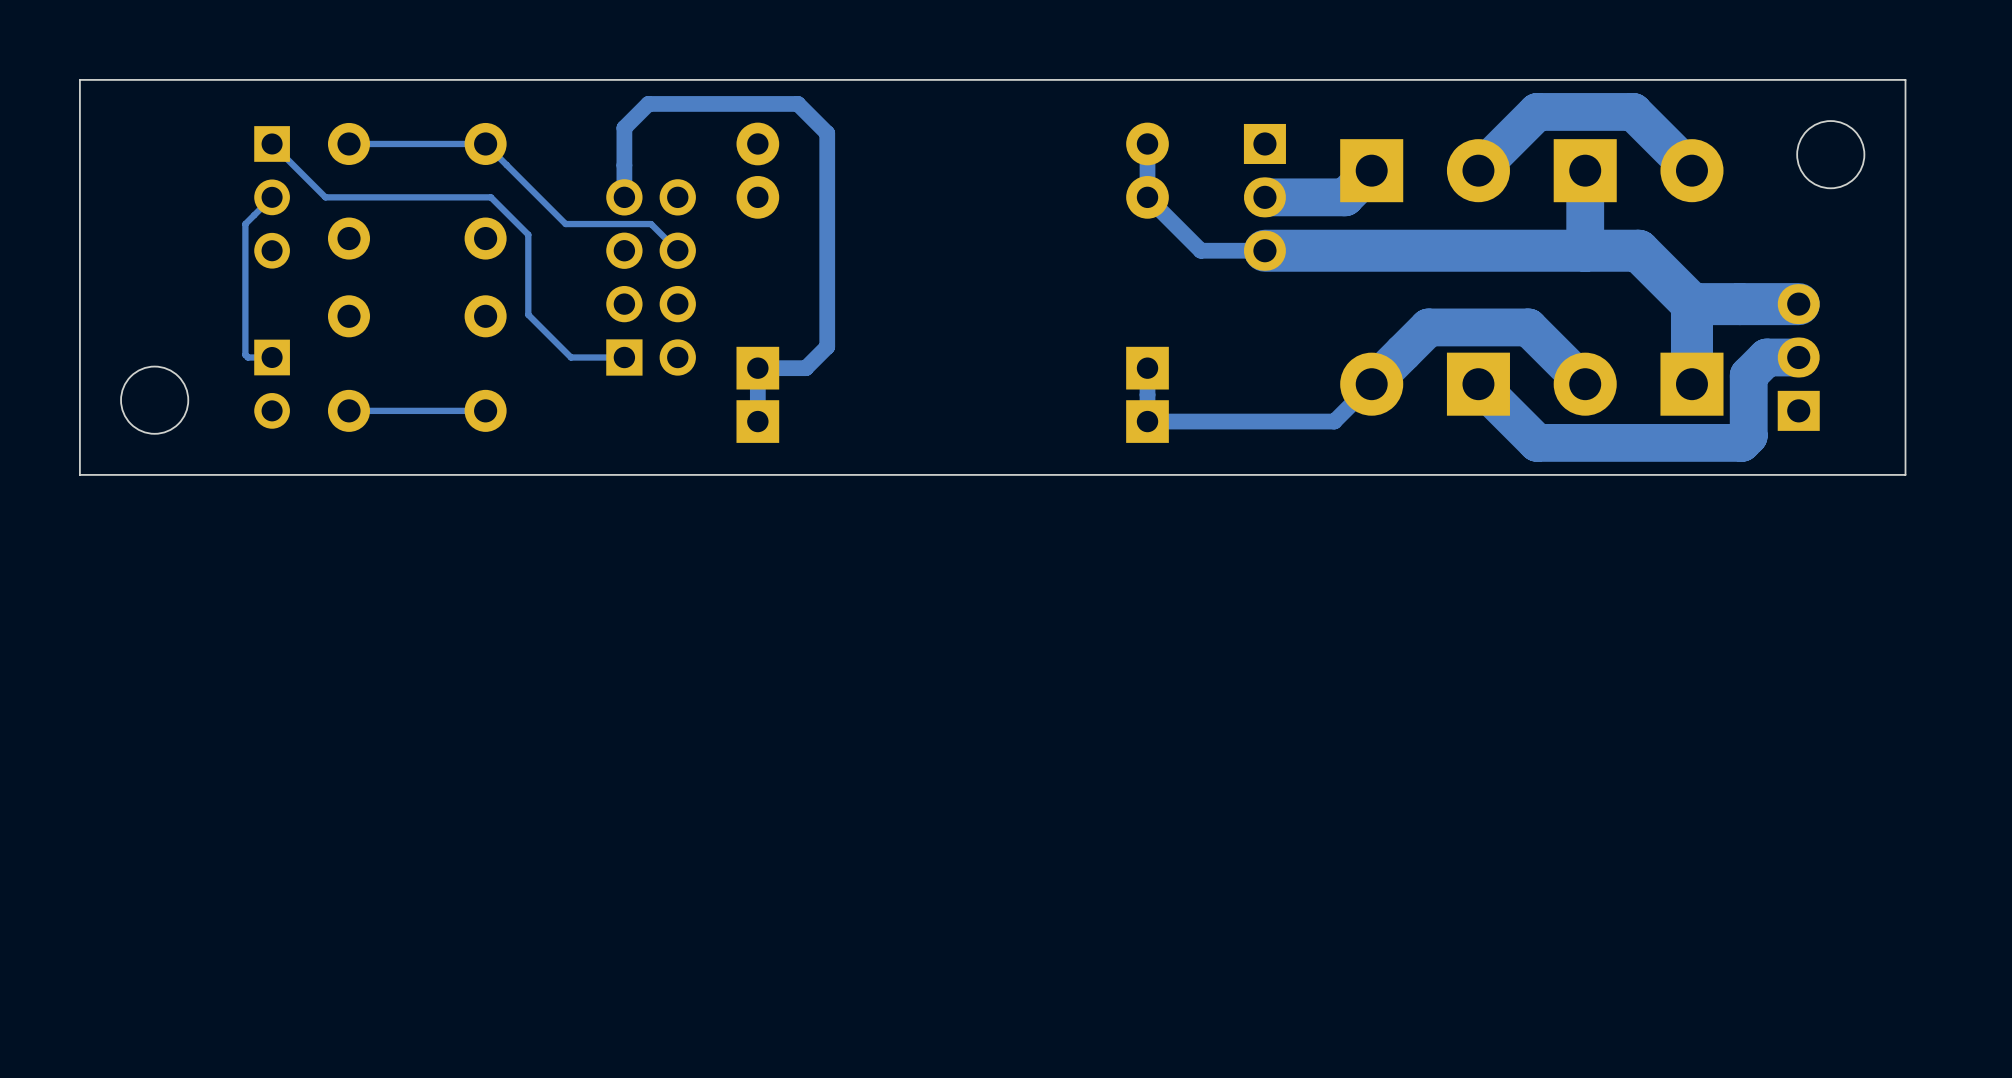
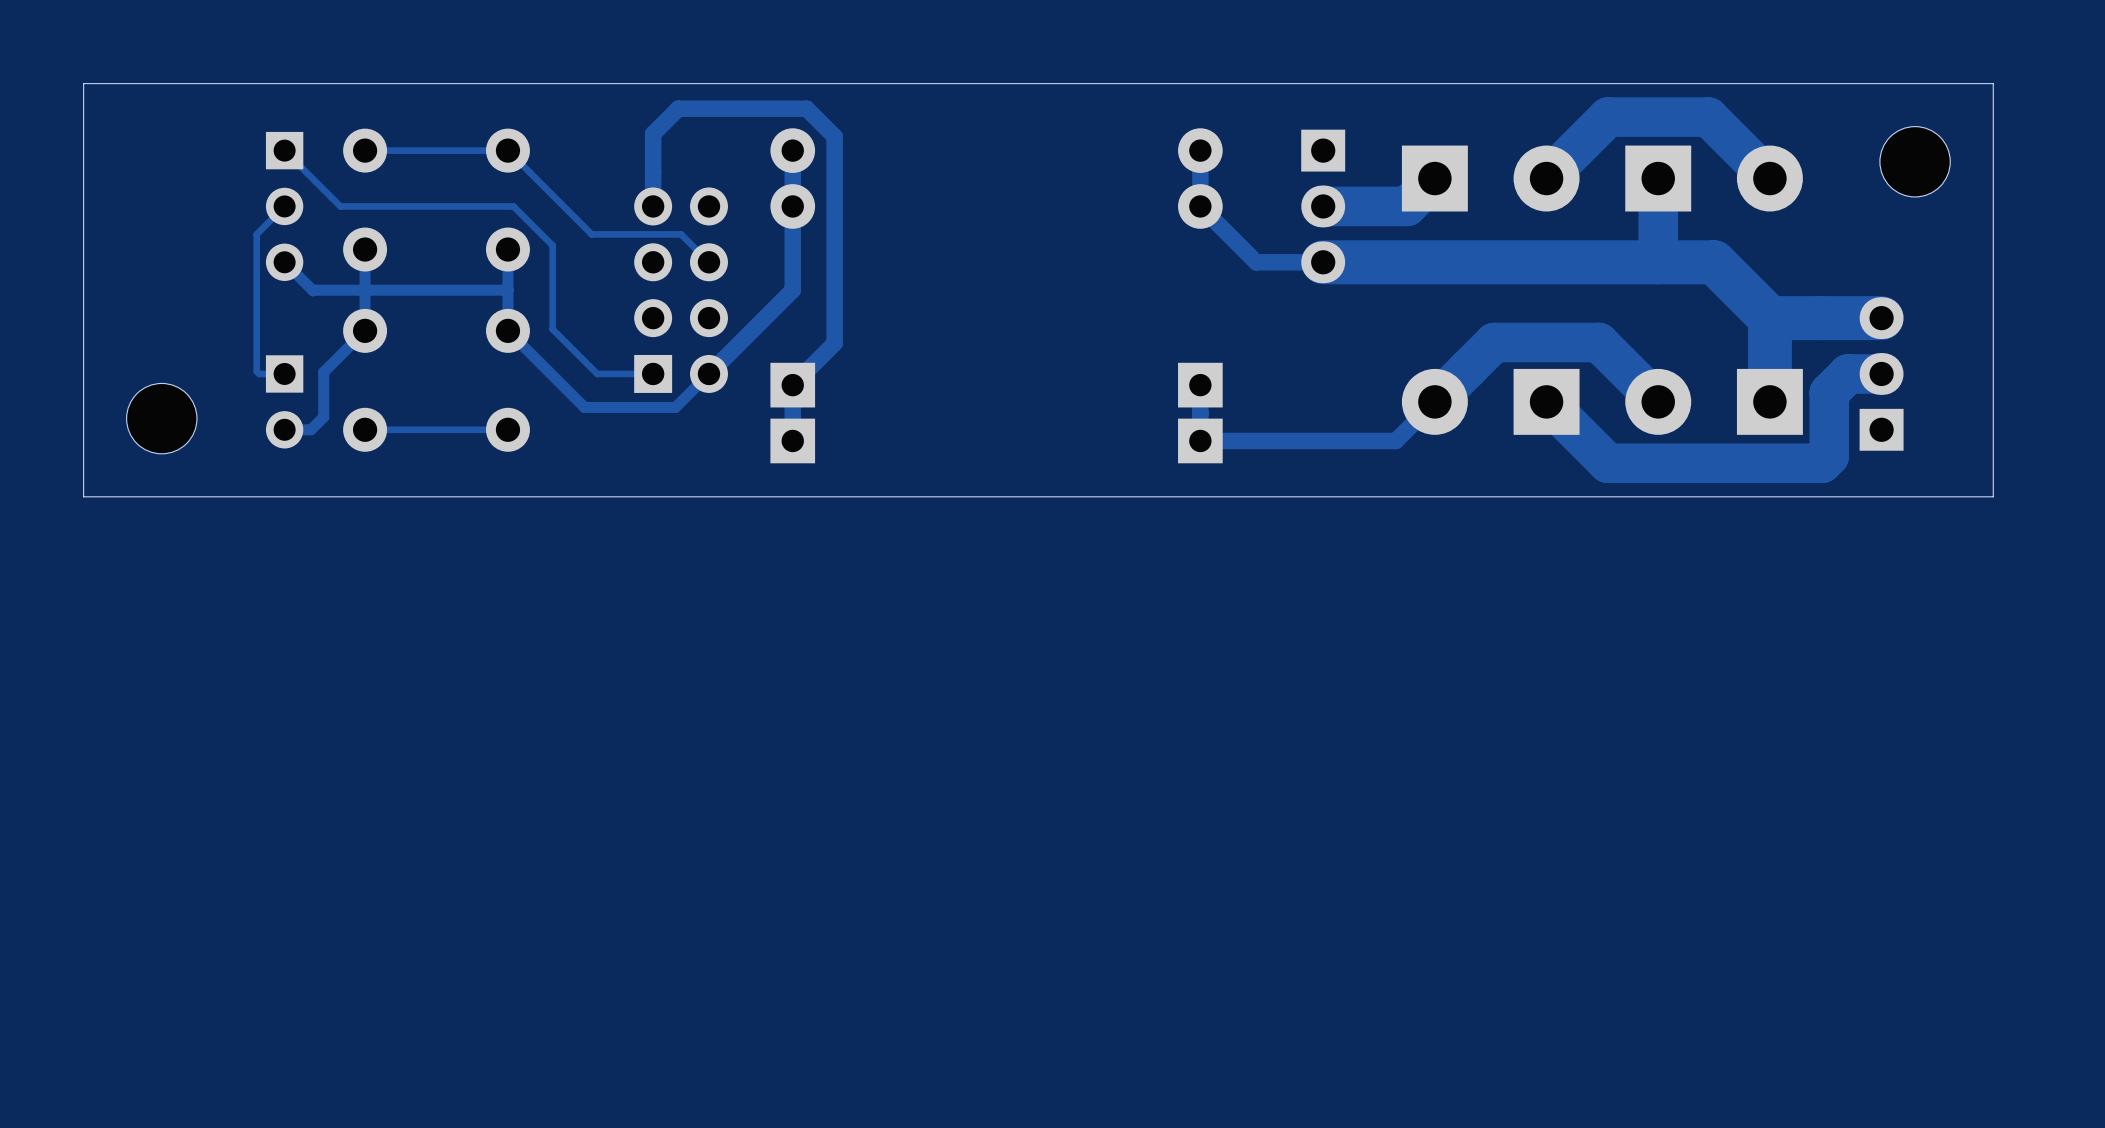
track: (771, 103) (797, 103) (827, 133) (827, 346) (805, 368) (757, 368) -> (806, 108) (834, 136) (834, 343) (792, 385)
track: none -> (792, 150) (792, 290) (675, 407) (584, 407) (507, 330) (507, 249)
track: none -> (365, 249) (365, 330) (323, 372) (323, 417) (311, 429) (284, 429)
track: none -> (284, 262) (313, 290) (507, 290)

